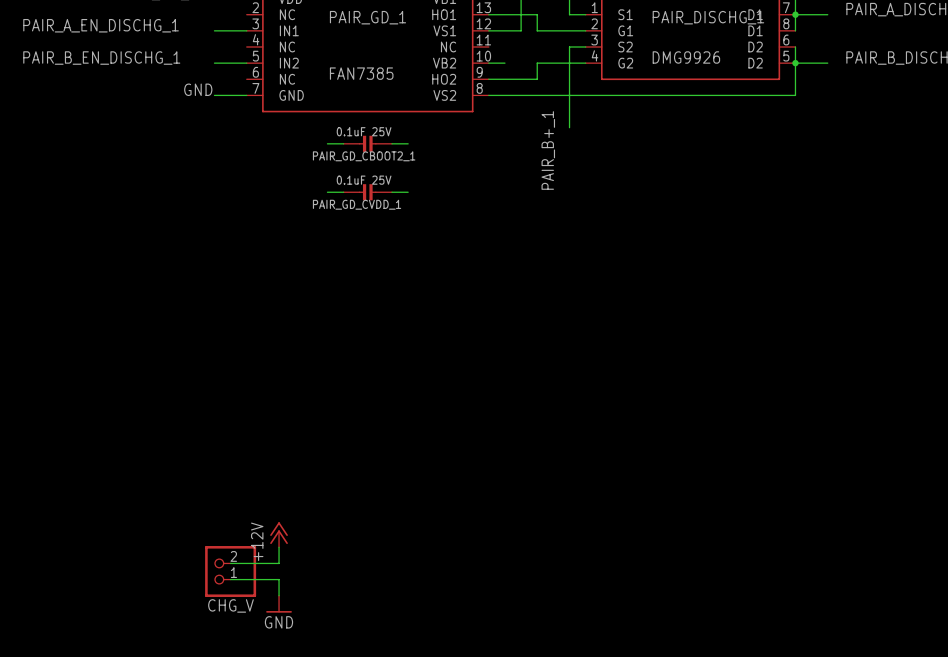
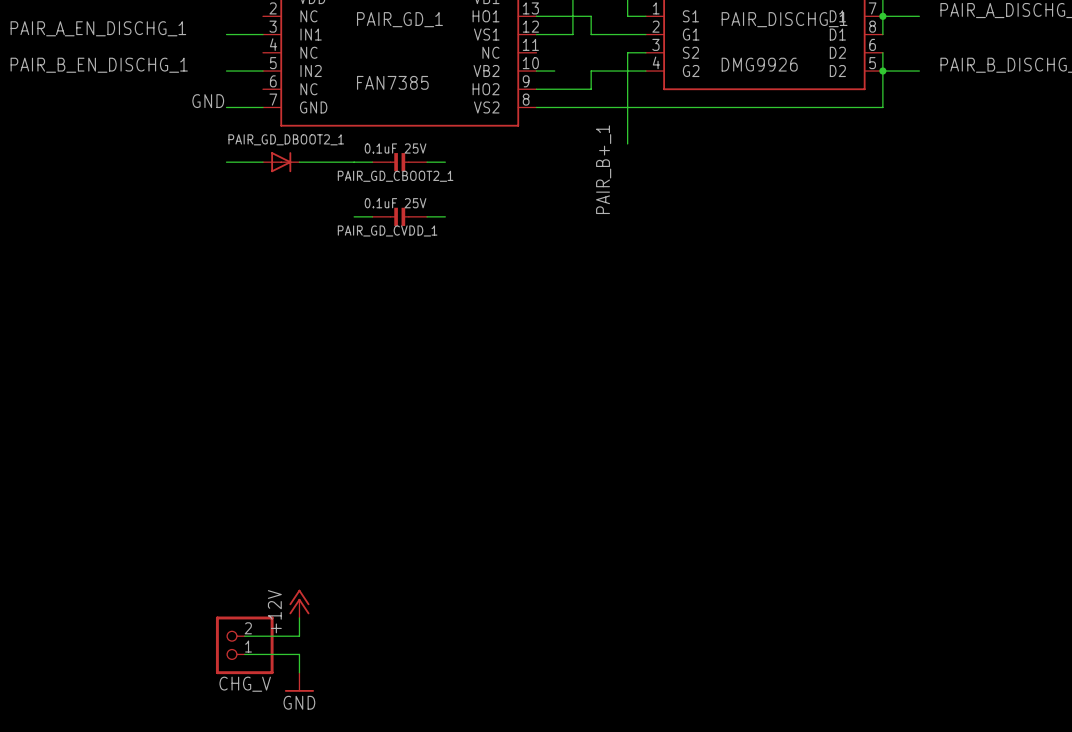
wire: none -> (226, 162) (262, 162)
PAIR_GD_DBOOT2_1: none -> (281, 162)
wire: none -> (299, 162) (354, 162)

